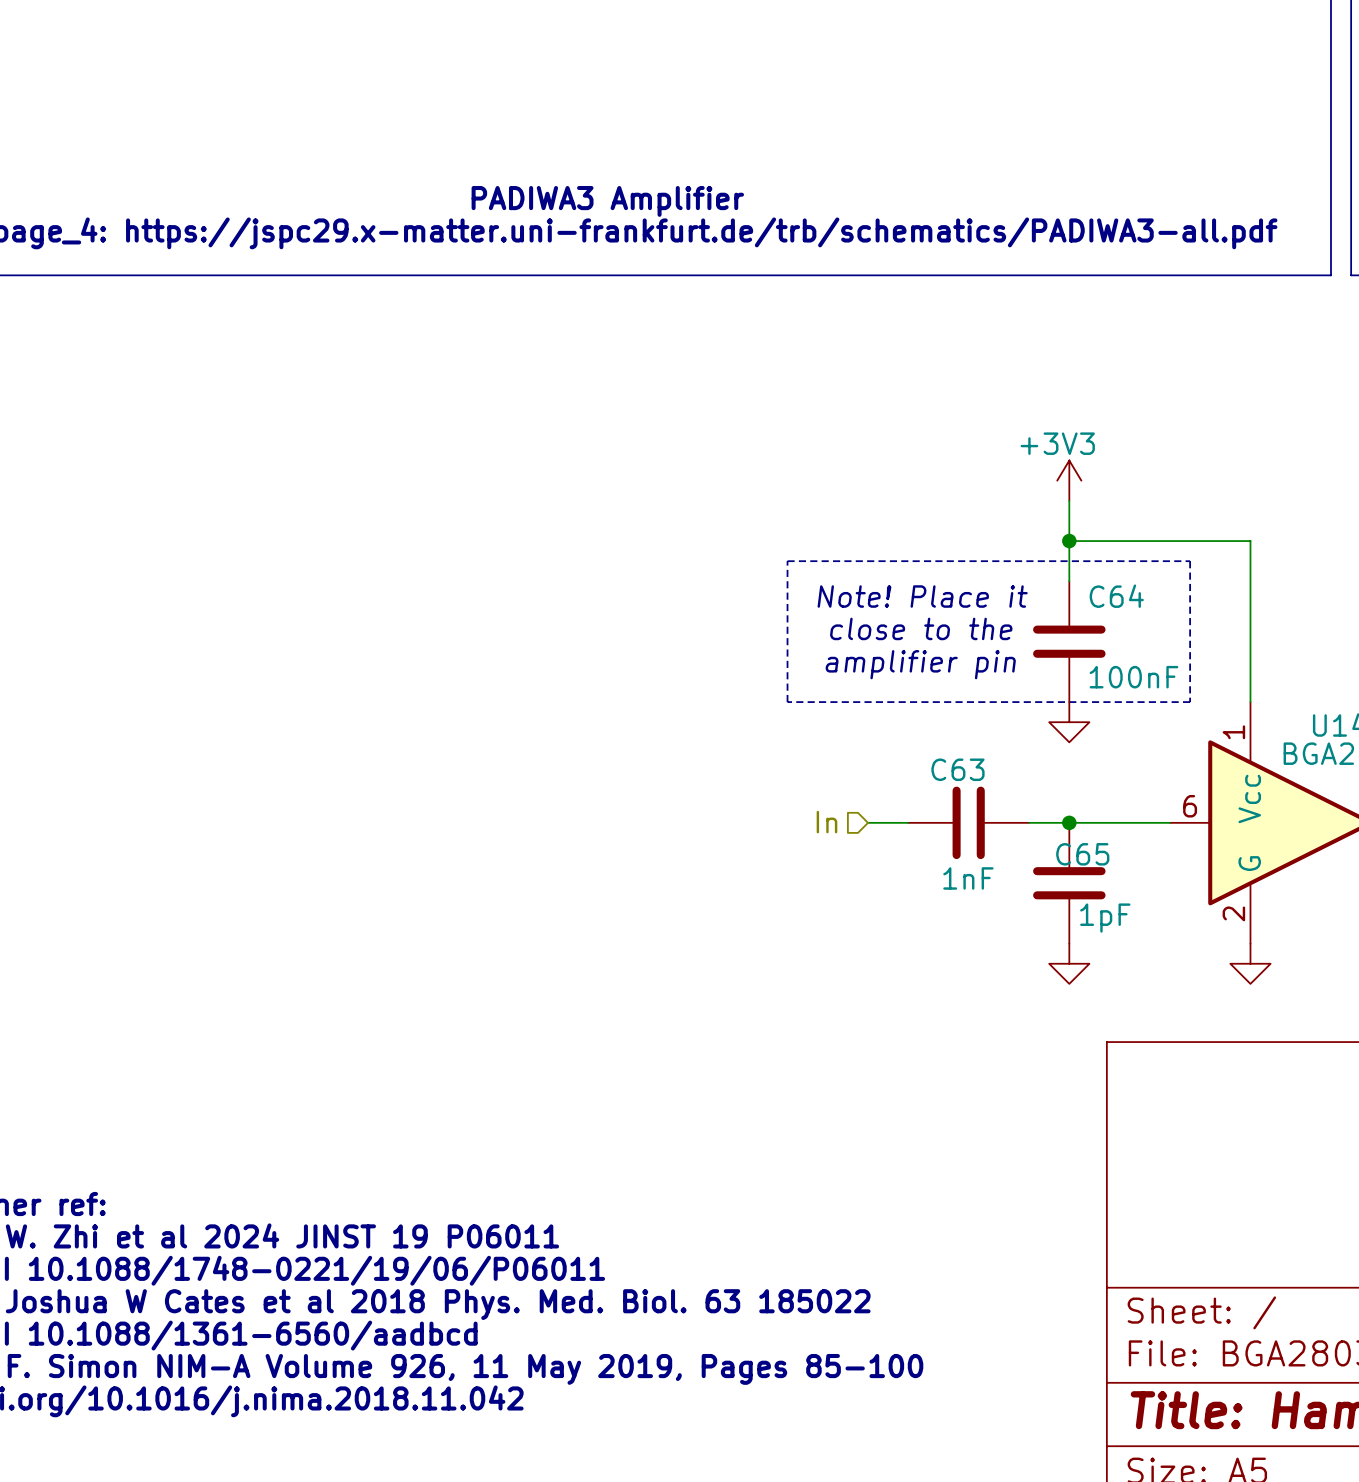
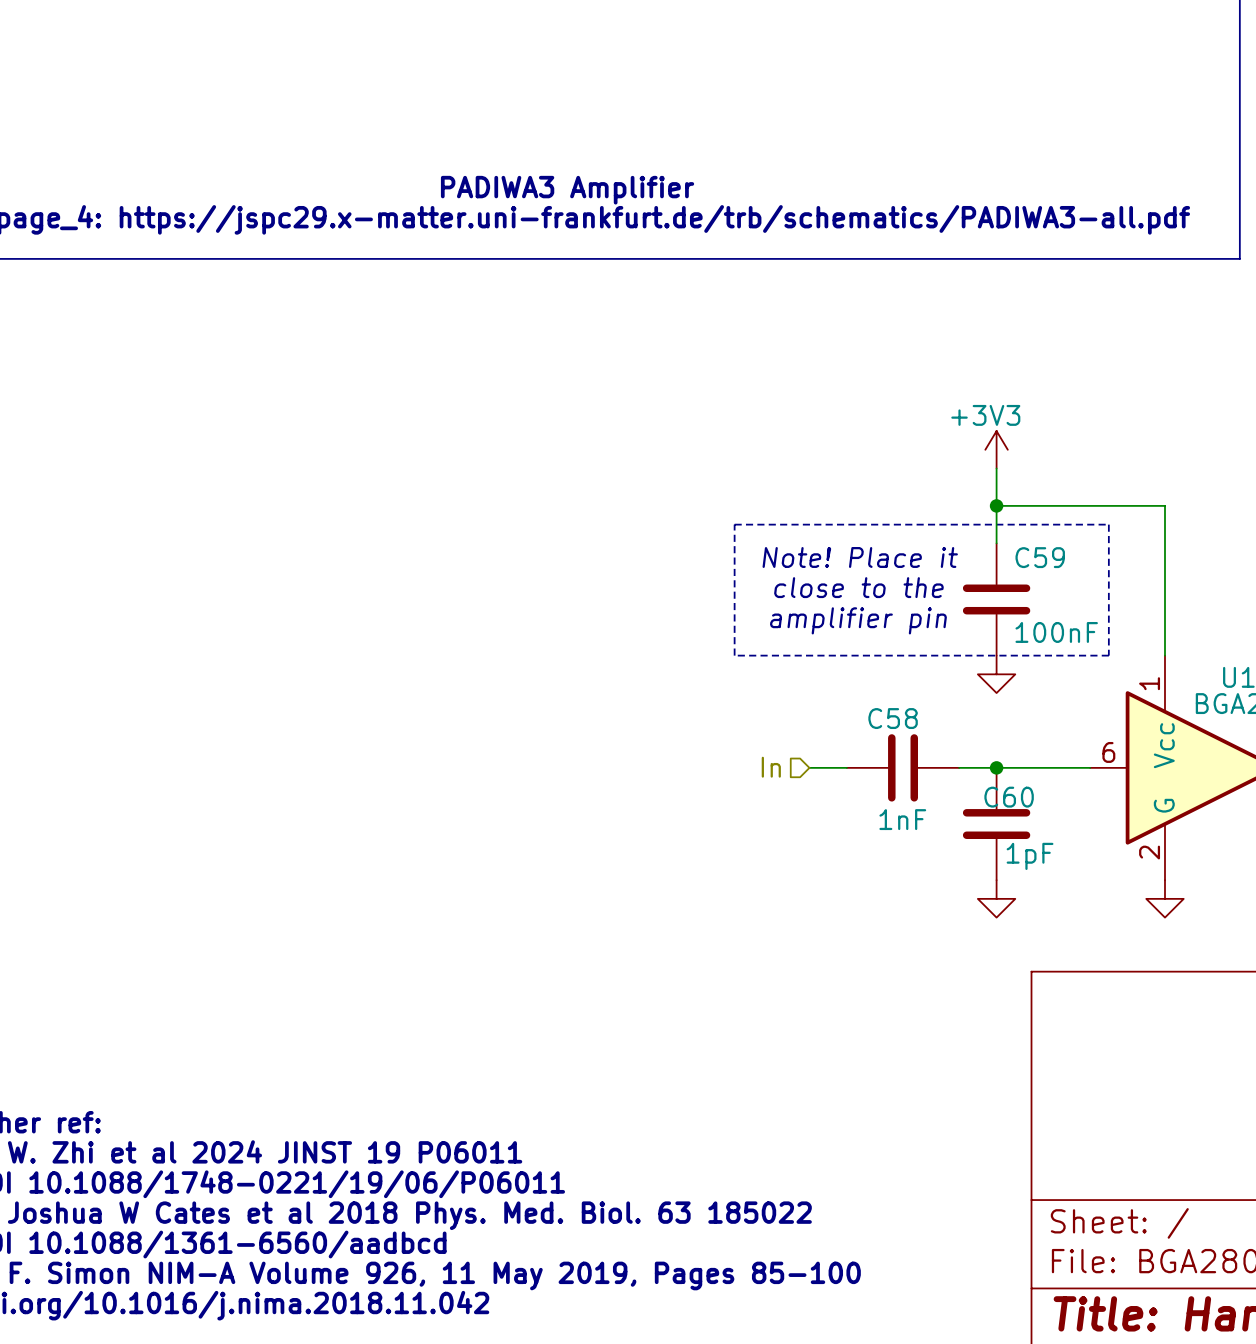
C64 name: C64 (1116, 596) -> C59 (1040, 557)
C63 name: C63 (957, 769) -> C58 (893, 718)
C65 name: C65 (1082, 854) -> C60 (1009, 797)

